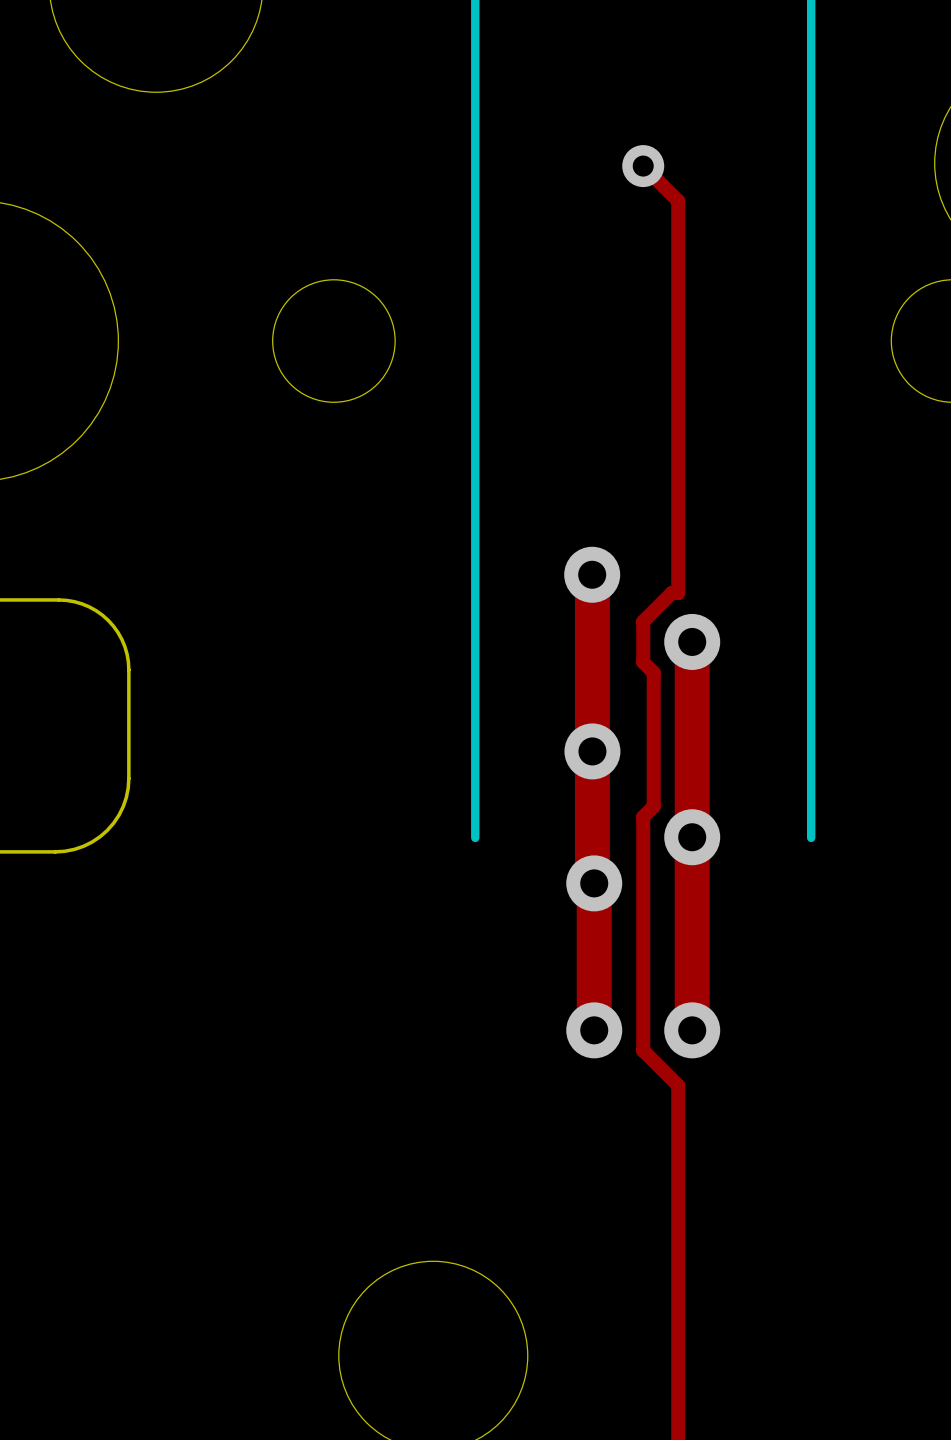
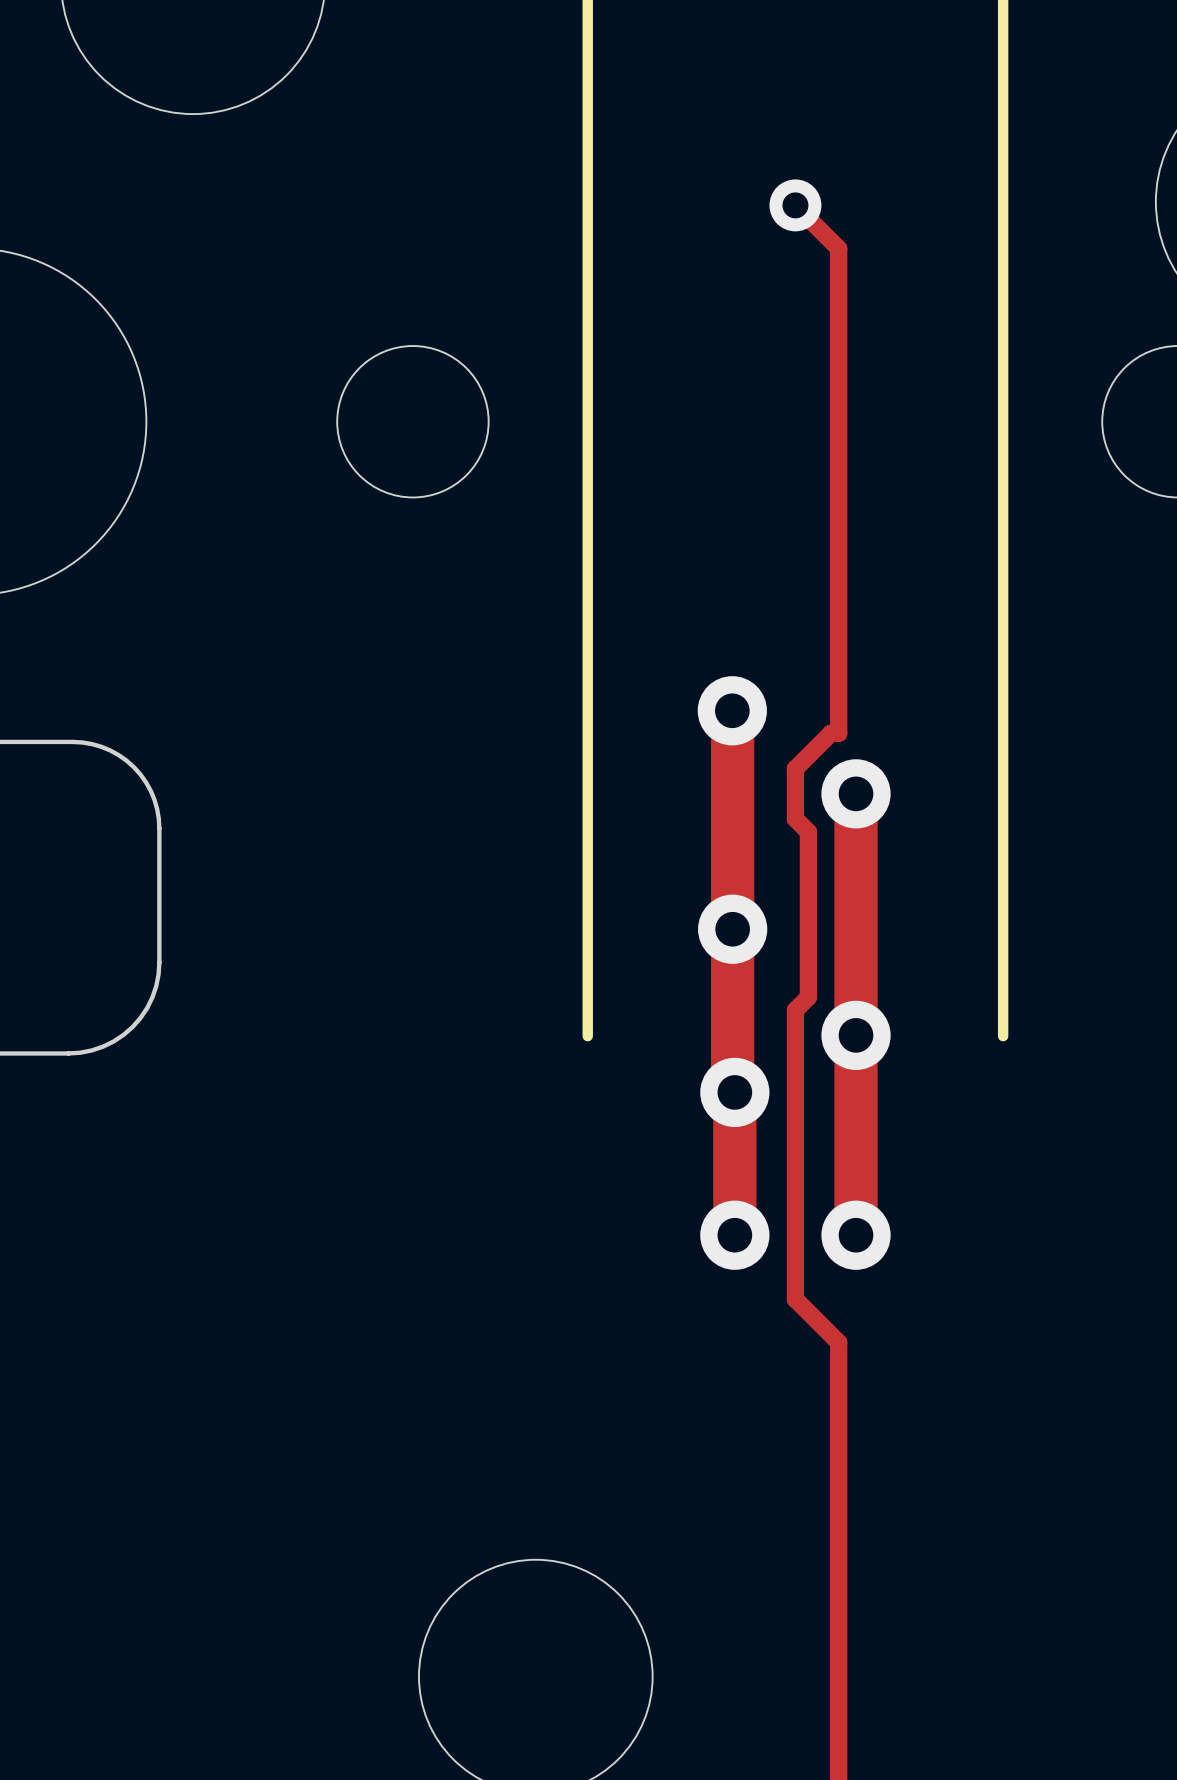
via position: (594, 1030) -> (734, 1235)
via position: (692, 1030) -> (856, 1235)

